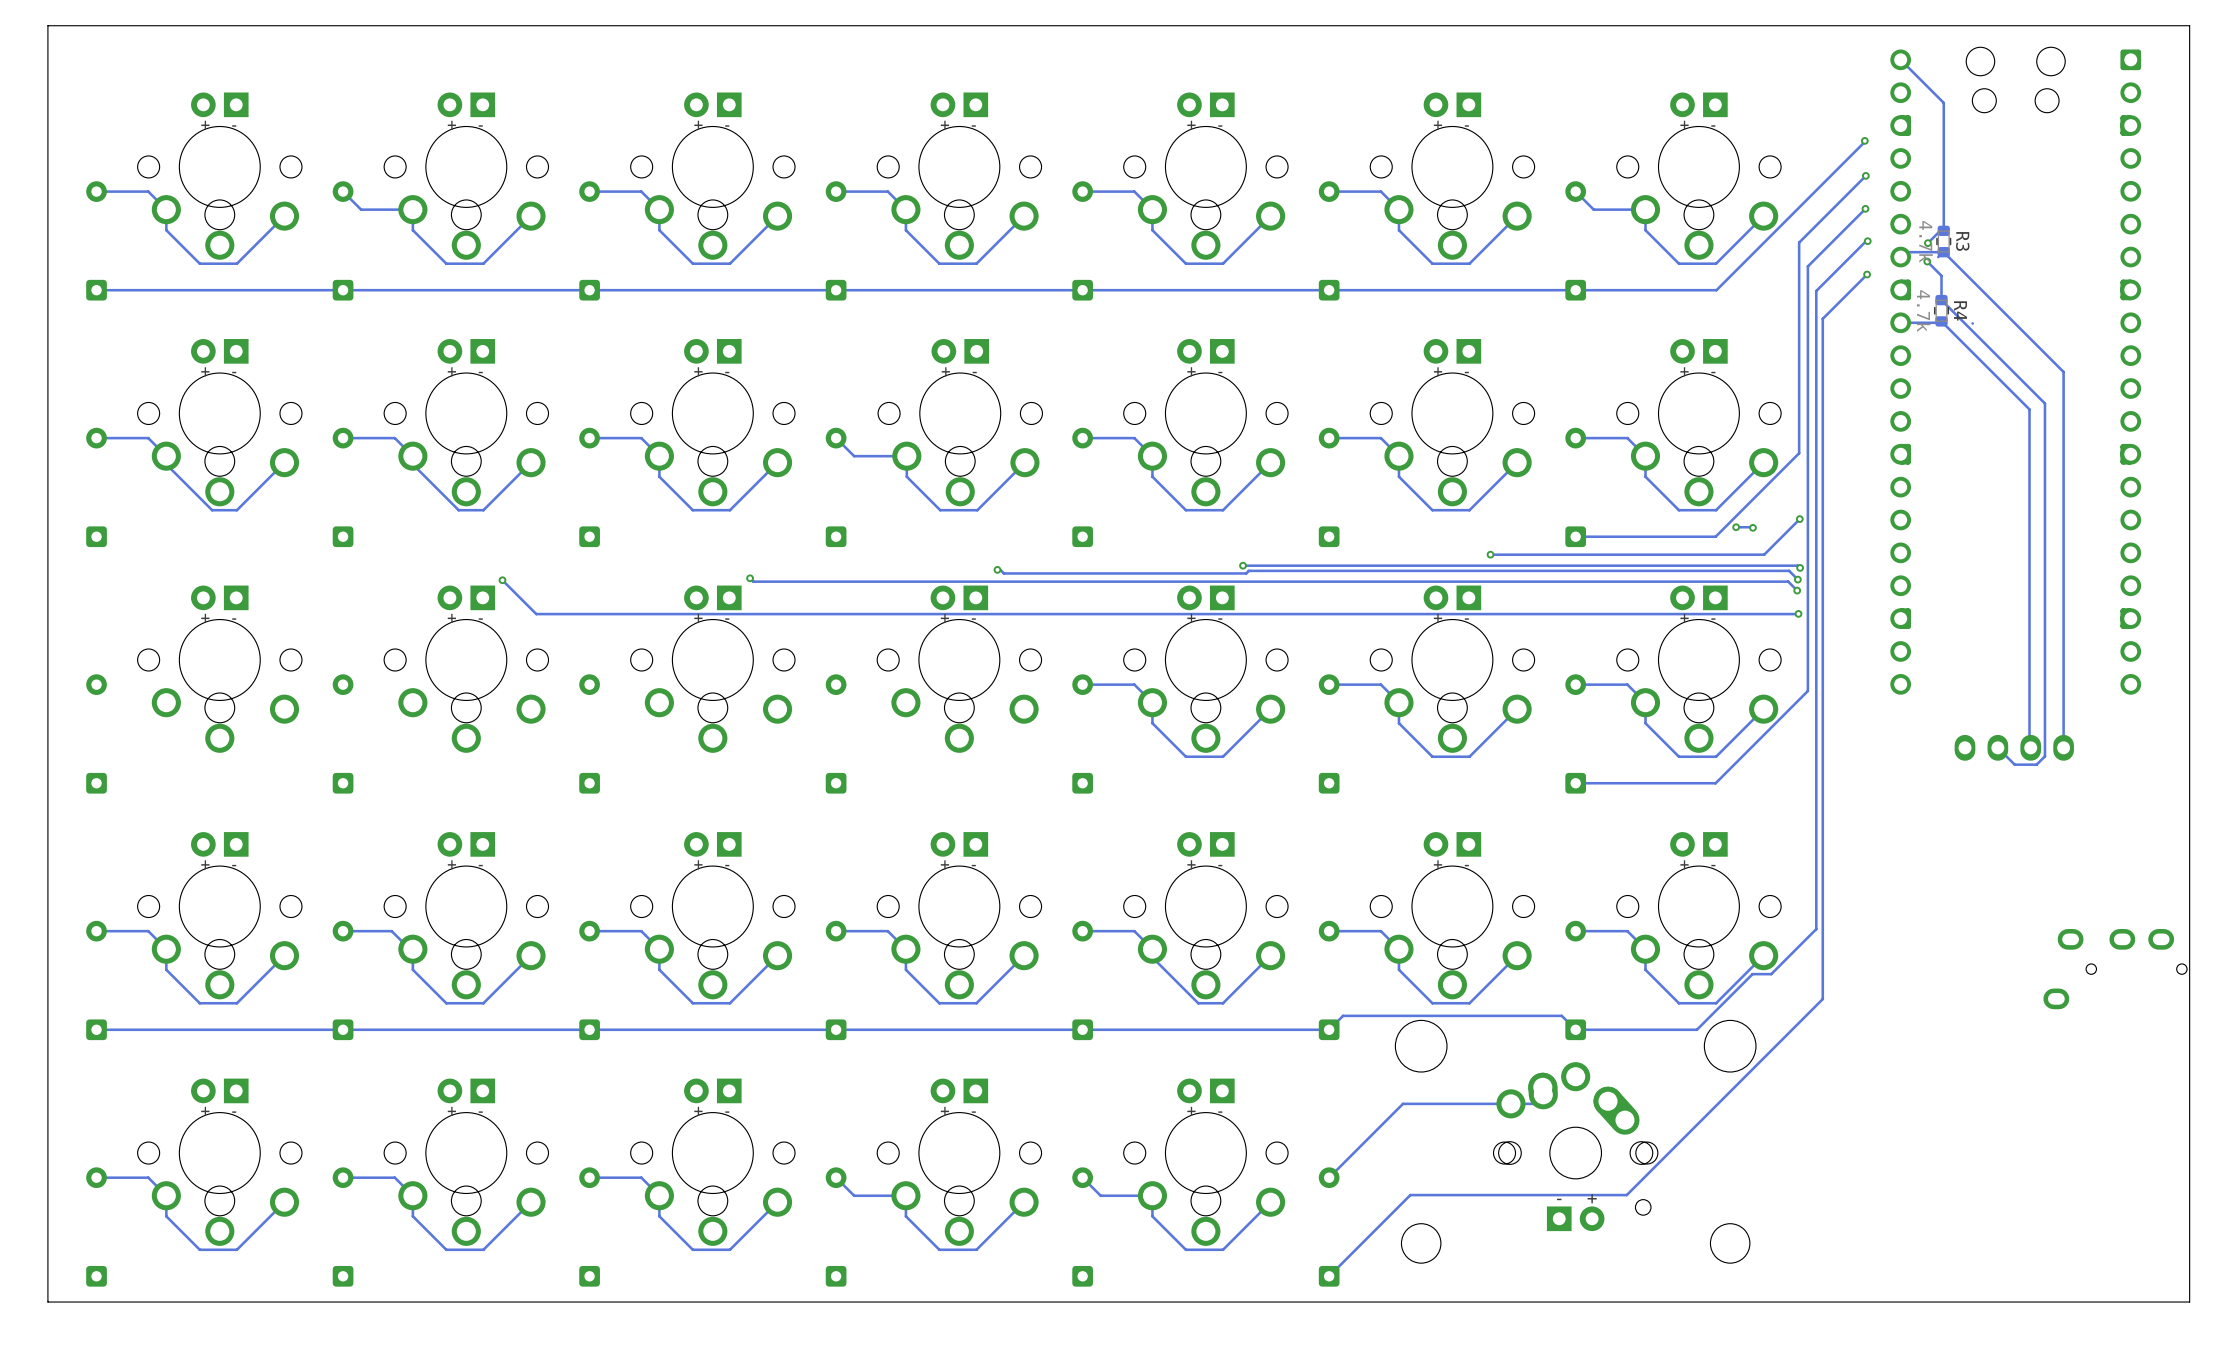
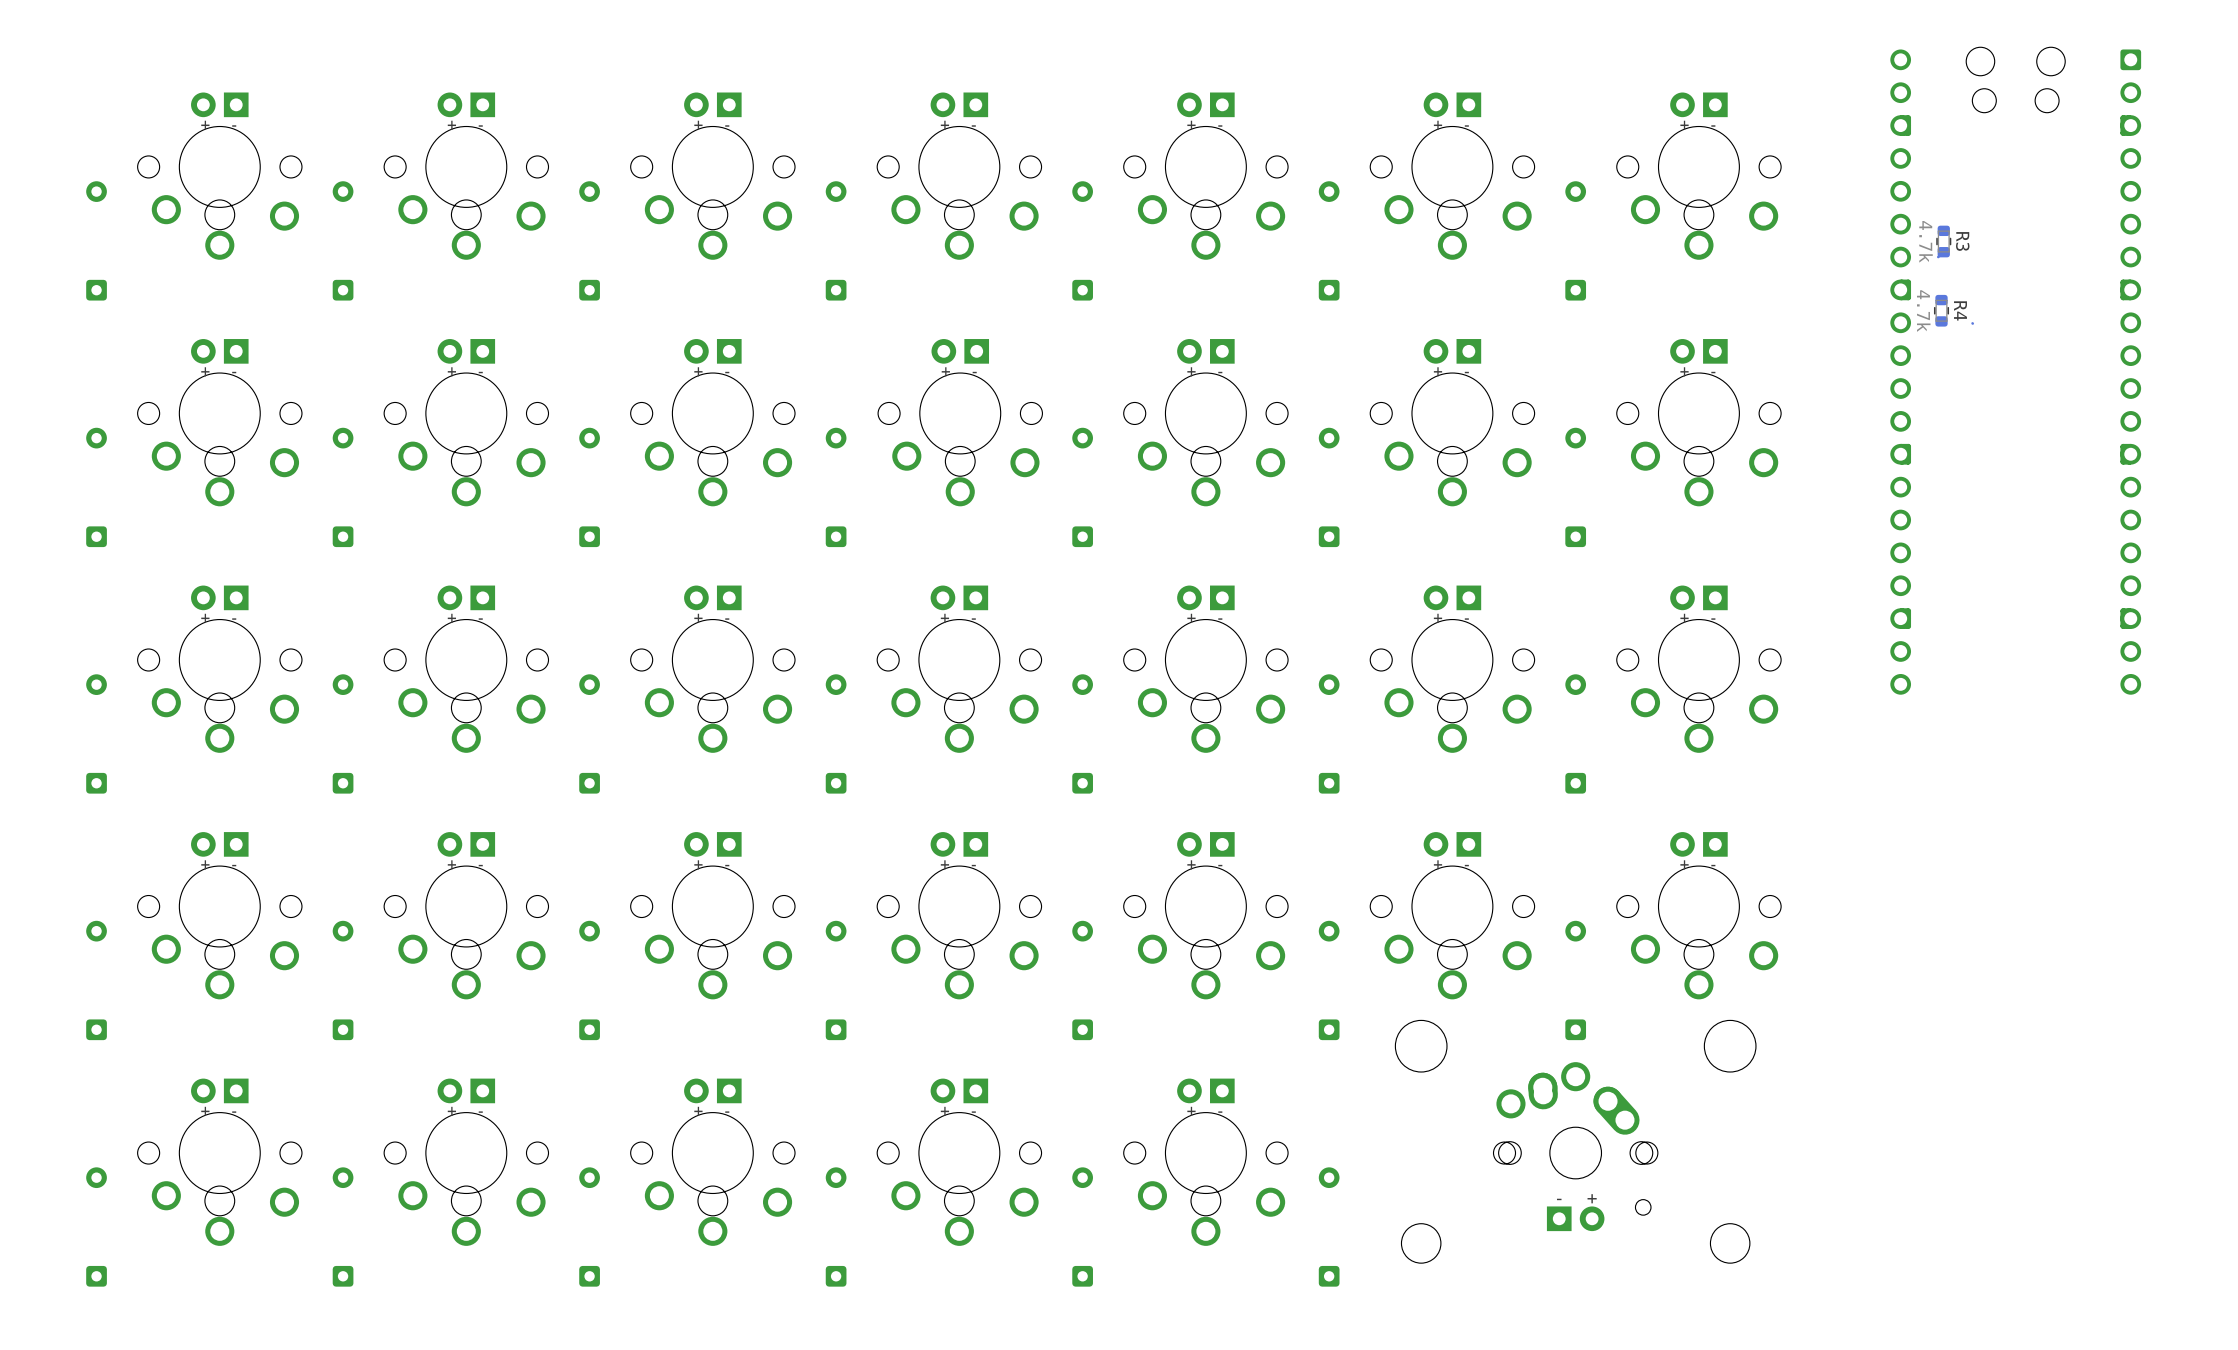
board edge: (2189, 25) (47, 25) (47, 1302) (2189, 1302) (2189, 25) -> none
track: (1900, 59) (1943, 102) (1943, 230) (1940, 230) (1927, 243) -> none
track: (1864, 140) (1716, 290) (96, 290) -> none
via: (1864, 140) -> none
track: (1865, 175) (1799, 242) (1799, 453) (1715, 536) (1575, 536) -> none
via: (1865, 175) -> none
track: (96, 191) (148, 191) (166, 209) (166, 230) (199, 263) (236, 263) (284, 216) -> none
track: (343, 191) (361, 209) (412, 209) (412, 230) (446, 263) (483, 263) (531, 216) -> none
track: (589, 191) (641, 191) (659, 209) (659, 230) (692, 263) (729, 263) (777, 216) -> none
track: (836, 191) (887, 191) (905, 209) (905, 230) (939, 263) (976, 263) (1024, 216) -> none
track: (1082, 191) (1134, 191) (1152, 209) (1152, 230) (1185, 263) (1223, 263) (1270, 216) -> none
track: (1329, 191) (1380, 191) (1398, 209) (1398, 230) (1432, 263) (1469, 263) (1517, 216) -> none
track: (1575, 191) (1593, 209) (1645, 209) (1645, 230) (1678, 263) (1716, 263) (1763, 216) -> none
track: (1865, 208) (1807, 266) (1807, 691) (1715, 783) (1575, 783) -> none
via: (1865, 208) -> none
track: (1867, 241) (1816, 291) (1816, 929) (1771, 974) (1752, 974) (1696, 1029) (1575, 1029) (1561, 1015) (1343, 1015) (1329, 1029) (96, 1029) -> none
via: (1867, 241) -> none
via: (1927, 243) -> none
track: (1900, 257) (1905, 252) (1943, 252) (2063, 372) (2063, 747) -> none
track: (1927, 261) (1941, 275) (1941, 300) (2044, 403) (2044, 756) (2036, 764) (2014, 764) (1997, 747) -> none
via: (1927, 261) -> none
track: (1867, 274) (1822, 318) (1822, 999) (1626, 1195) (1410, 1195) (1329, 1276) -> none
via: (1867, 274) -> none
track: (1900, 322) (1941, 321) (2029, 409) (2030, 747) -> none
track: (96, 438) (148, 438) (166, 456) (166, 464) (212, 510) (236, 510) (284, 462) -> none
track: (343, 438) (394, 438) (412, 456) (412, 464) (458, 510) (483, 510) (531, 462) -> none
track: (589, 438) (641, 438) (659, 456) (659, 476) (692, 510) (729, 510) (777, 462) -> none
track: (836, 438) (854, 456) (906, 456) (906, 476) (940, 510) (977, 510) (1024, 462) -> none
track: (1082, 438) (1134, 438) (1152, 456) (1152, 476) (1185, 510) (1223, 510) (1270, 462) -> none
track: (1329, 438) (1380, 438) (1398, 456) (1398, 476) (1432, 510) (1469, 510) (1517, 462) -> none
track: (1575, 438) (1627, 438) (1645, 456) (1645, 476) (1678, 510) (1716, 510) (1763, 462) -> none
track: (1799, 519) (1764, 554) (1490, 554) -> none
via: (1799, 519) -> none
track: (1736, 527) (1752, 527) -> none
via: (1736, 527) -> none
via: (1752, 527) -> none
via: (1490, 554) -> none
track: (1243, 565) (1797, 565) (1800, 567) -> none
via: (1243, 565) -> none
via: (1800, 567) -> none
track: (997, 569) (1003, 573) (1246, 573) (1248, 570) (1789, 570) (1797, 579) -> none
via: (997, 569) -> none
track: (750, 578) (753, 581) (1788, 581) (1797, 590) -> none
via: (750, 578) -> none
via: (1797, 579) -> none
track: (502, 580) (536, 614) (1798, 613) -> none
via: (502, 580) -> none
via: (1797, 590) -> none
via: (1798, 613) -> none
track: (1082, 684) (1134, 684) (1152, 702) (1152, 723) (1185, 756) (1223, 756) (1270, 709) -> none
track: (1329, 684) (1380, 684) (1398, 702) (1398, 723) (1432, 756) (1469, 756) (1517, 709) -> none
track: (1575, 684) (1627, 684) (1645, 702) (1645, 723) (1678, 756) (1716, 756) (1763, 709) -> none
part: (2014, 747) -> none
track: (96, 931) (148, 931) (166, 949) (166, 969) (199, 1003) (236, 1003) (284, 955) -> none
track: (343, 931) (391, 931) (409, 949) (412, 949) (412, 969) (446, 1003) (483, 1003) (531, 955) -> none
track: (589, 931) (641, 931) (659, 949) (659, 969) (692, 1003) (729, 1003) (777, 955) -> none
track: (836, 931) (887, 931) (905, 949) (905, 969) (939, 1003) (976, 1003) (1024, 955) -> none
track: (1082, 931) (1134, 931) (1152, 949) (1152, 957) (1198, 1003) (1223, 1003) (1270, 955) -> none
track: (1329, 931) (1380, 931) (1398, 949) (1398, 969) (1432, 1003) (1469, 1003) (1517, 955) -> none
track: (1575, 931) (1627, 931) (1645, 949) (1645, 969) (1678, 1003) (1716, 1003) (1763, 955) -> none
part: (2115, 969) -> none
track: (1543, 1094) (1534, 1103) (1402, 1103) (1329, 1177) -> none
track: (96, 1177) (148, 1177) (166, 1195) (166, 1216) (199, 1249) (236, 1249) (284, 1202) -> none
track: (343, 1177) (394, 1177) (412, 1195) (412, 1216) (446, 1249) (483, 1249) (531, 1202) -> none
track: (589, 1177) (641, 1177) (659, 1195) (659, 1216) (692, 1249) (729, 1249) (777, 1202) -> none
track: (836, 1177) (854, 1195) (905, 1195) (905, 1216) (939, 1249) (976, 1249) (1024, 1202) -> none
track: (1082, 1177) (1100, 1195) (1152, 1195) (1152, 1216) (1185, 1249) (1223, 1249) (1270, 1202) -> none

